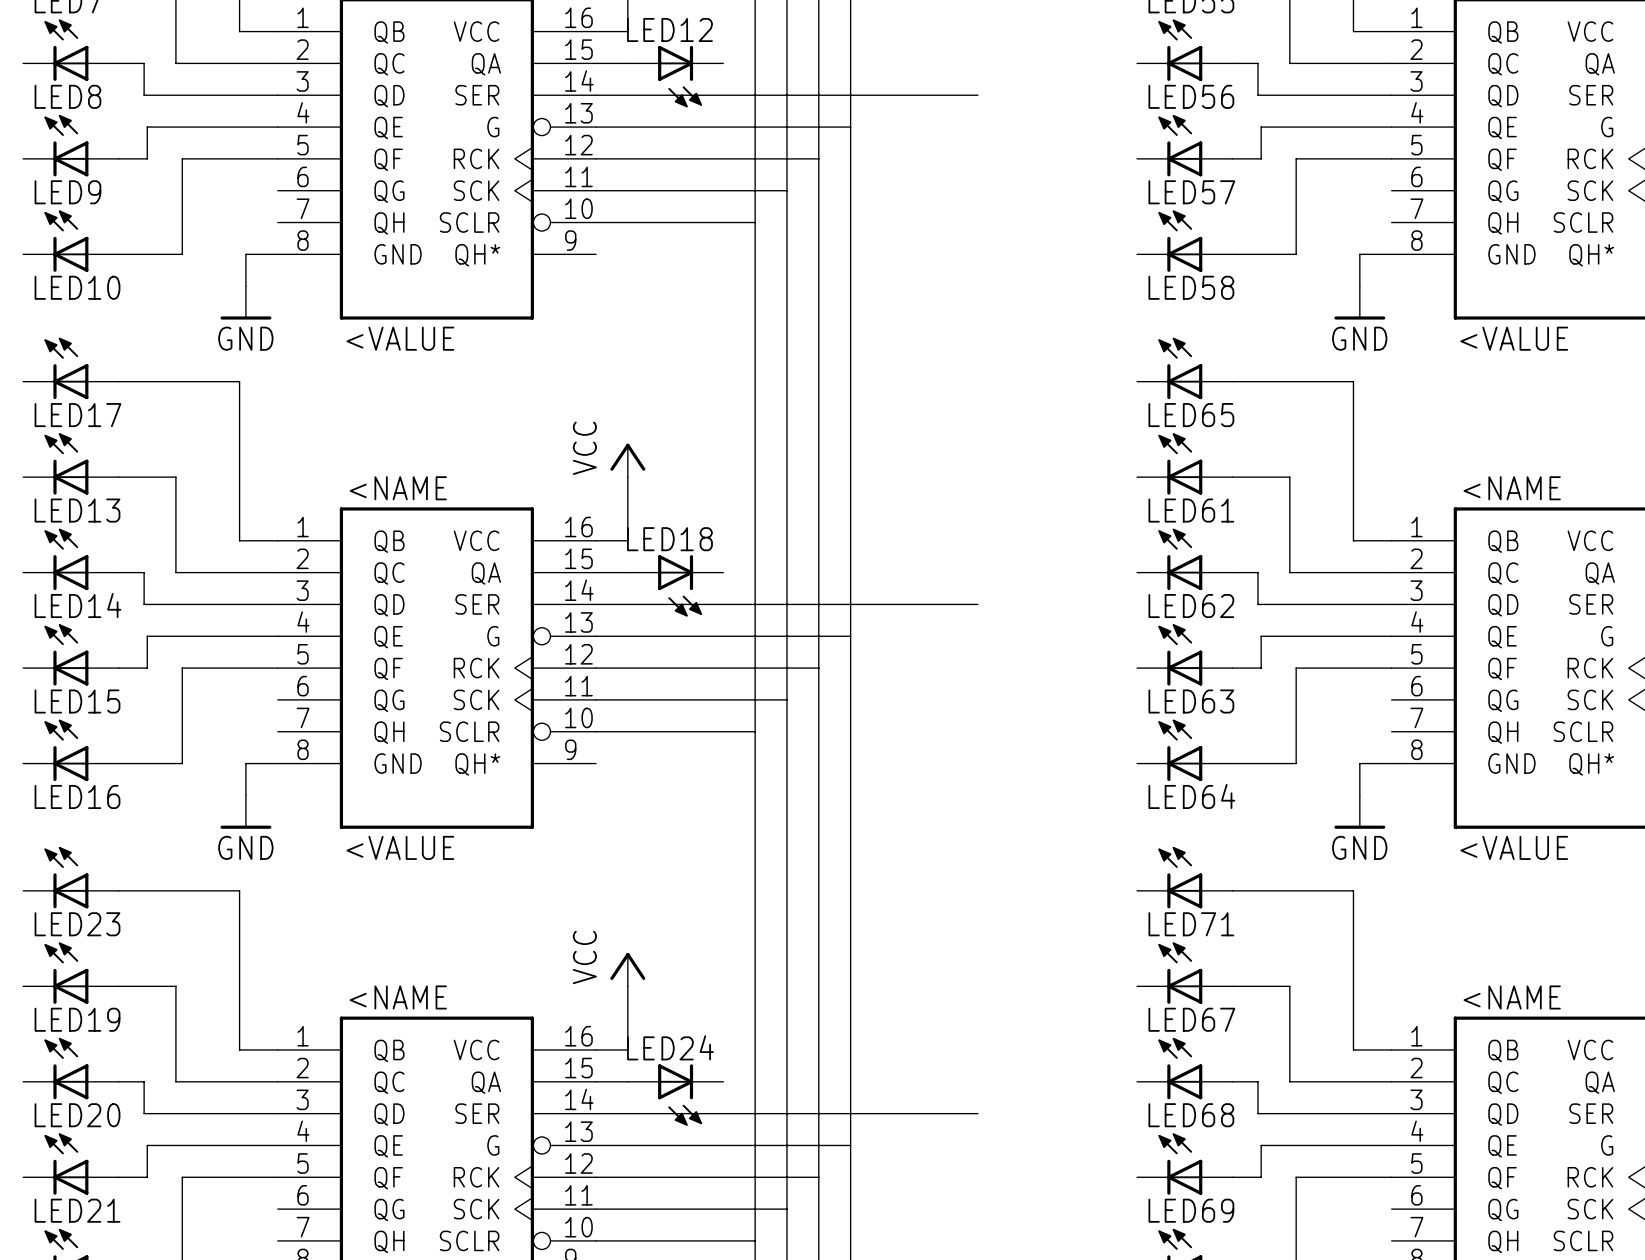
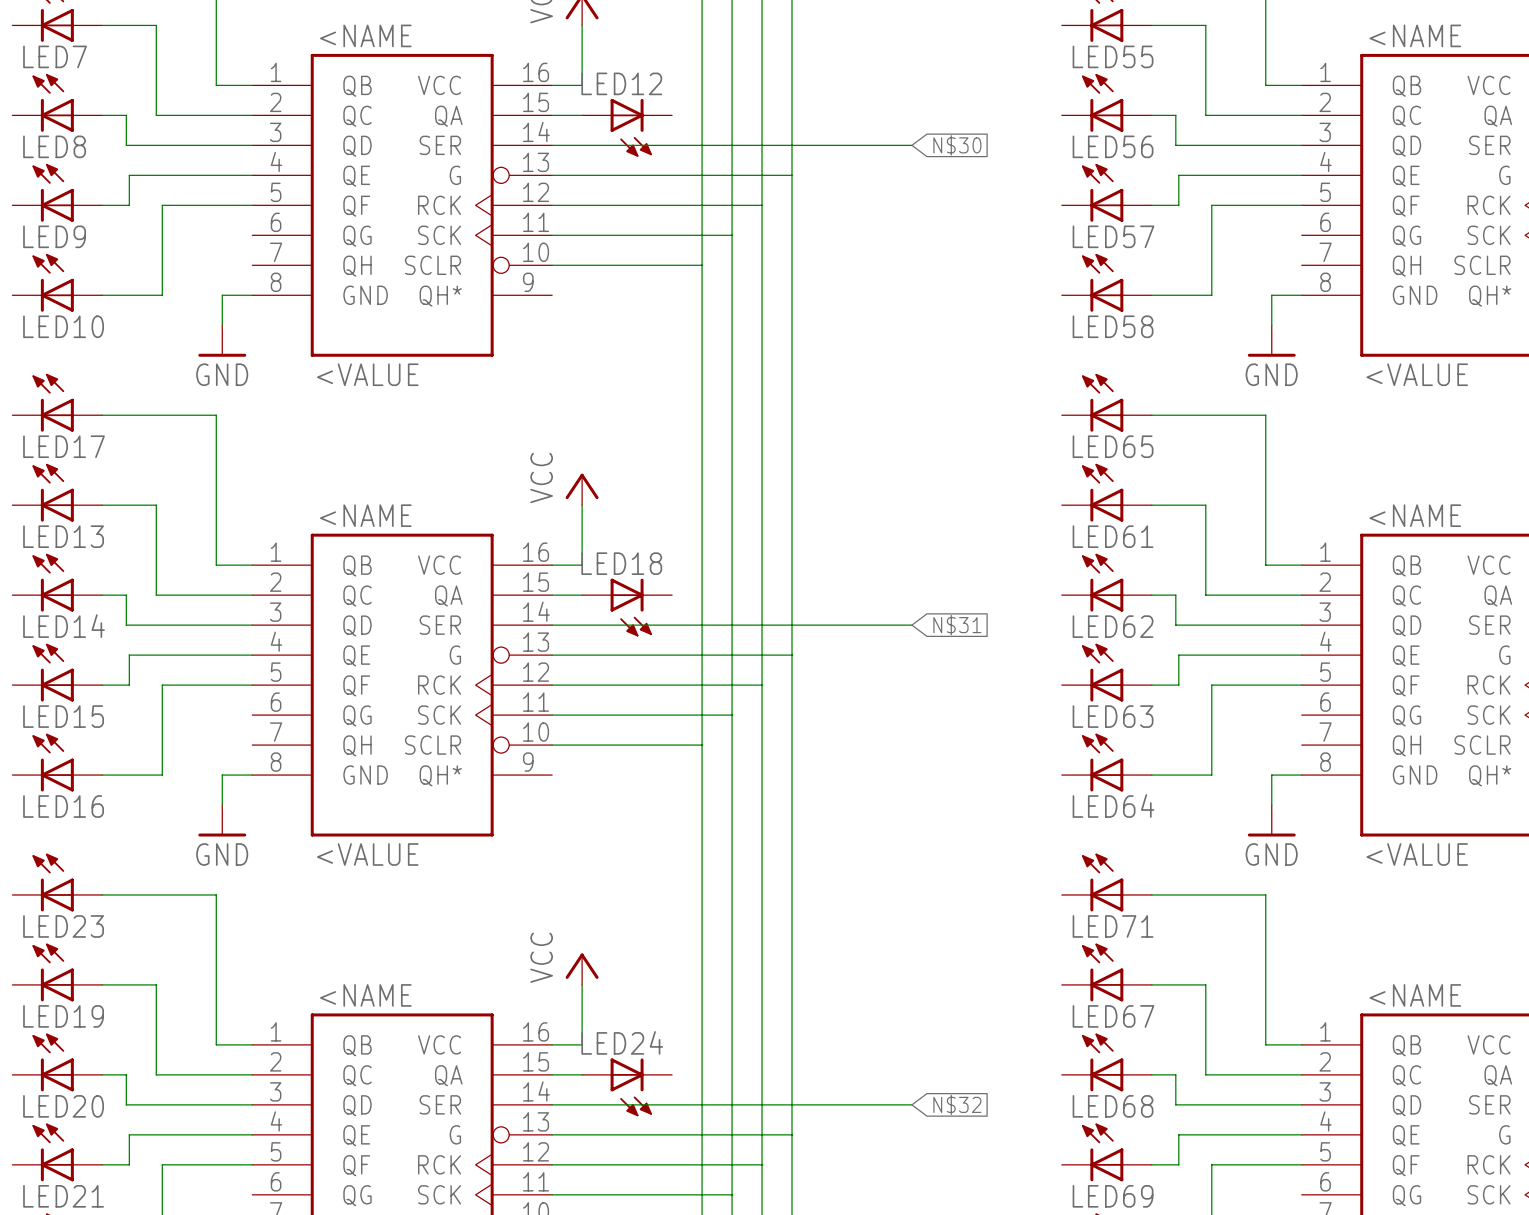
global label: none -> N$30 (957, 145)
global label: none -> N$31 (957, 625)
global label: none -> N$32 (957, 1104)

